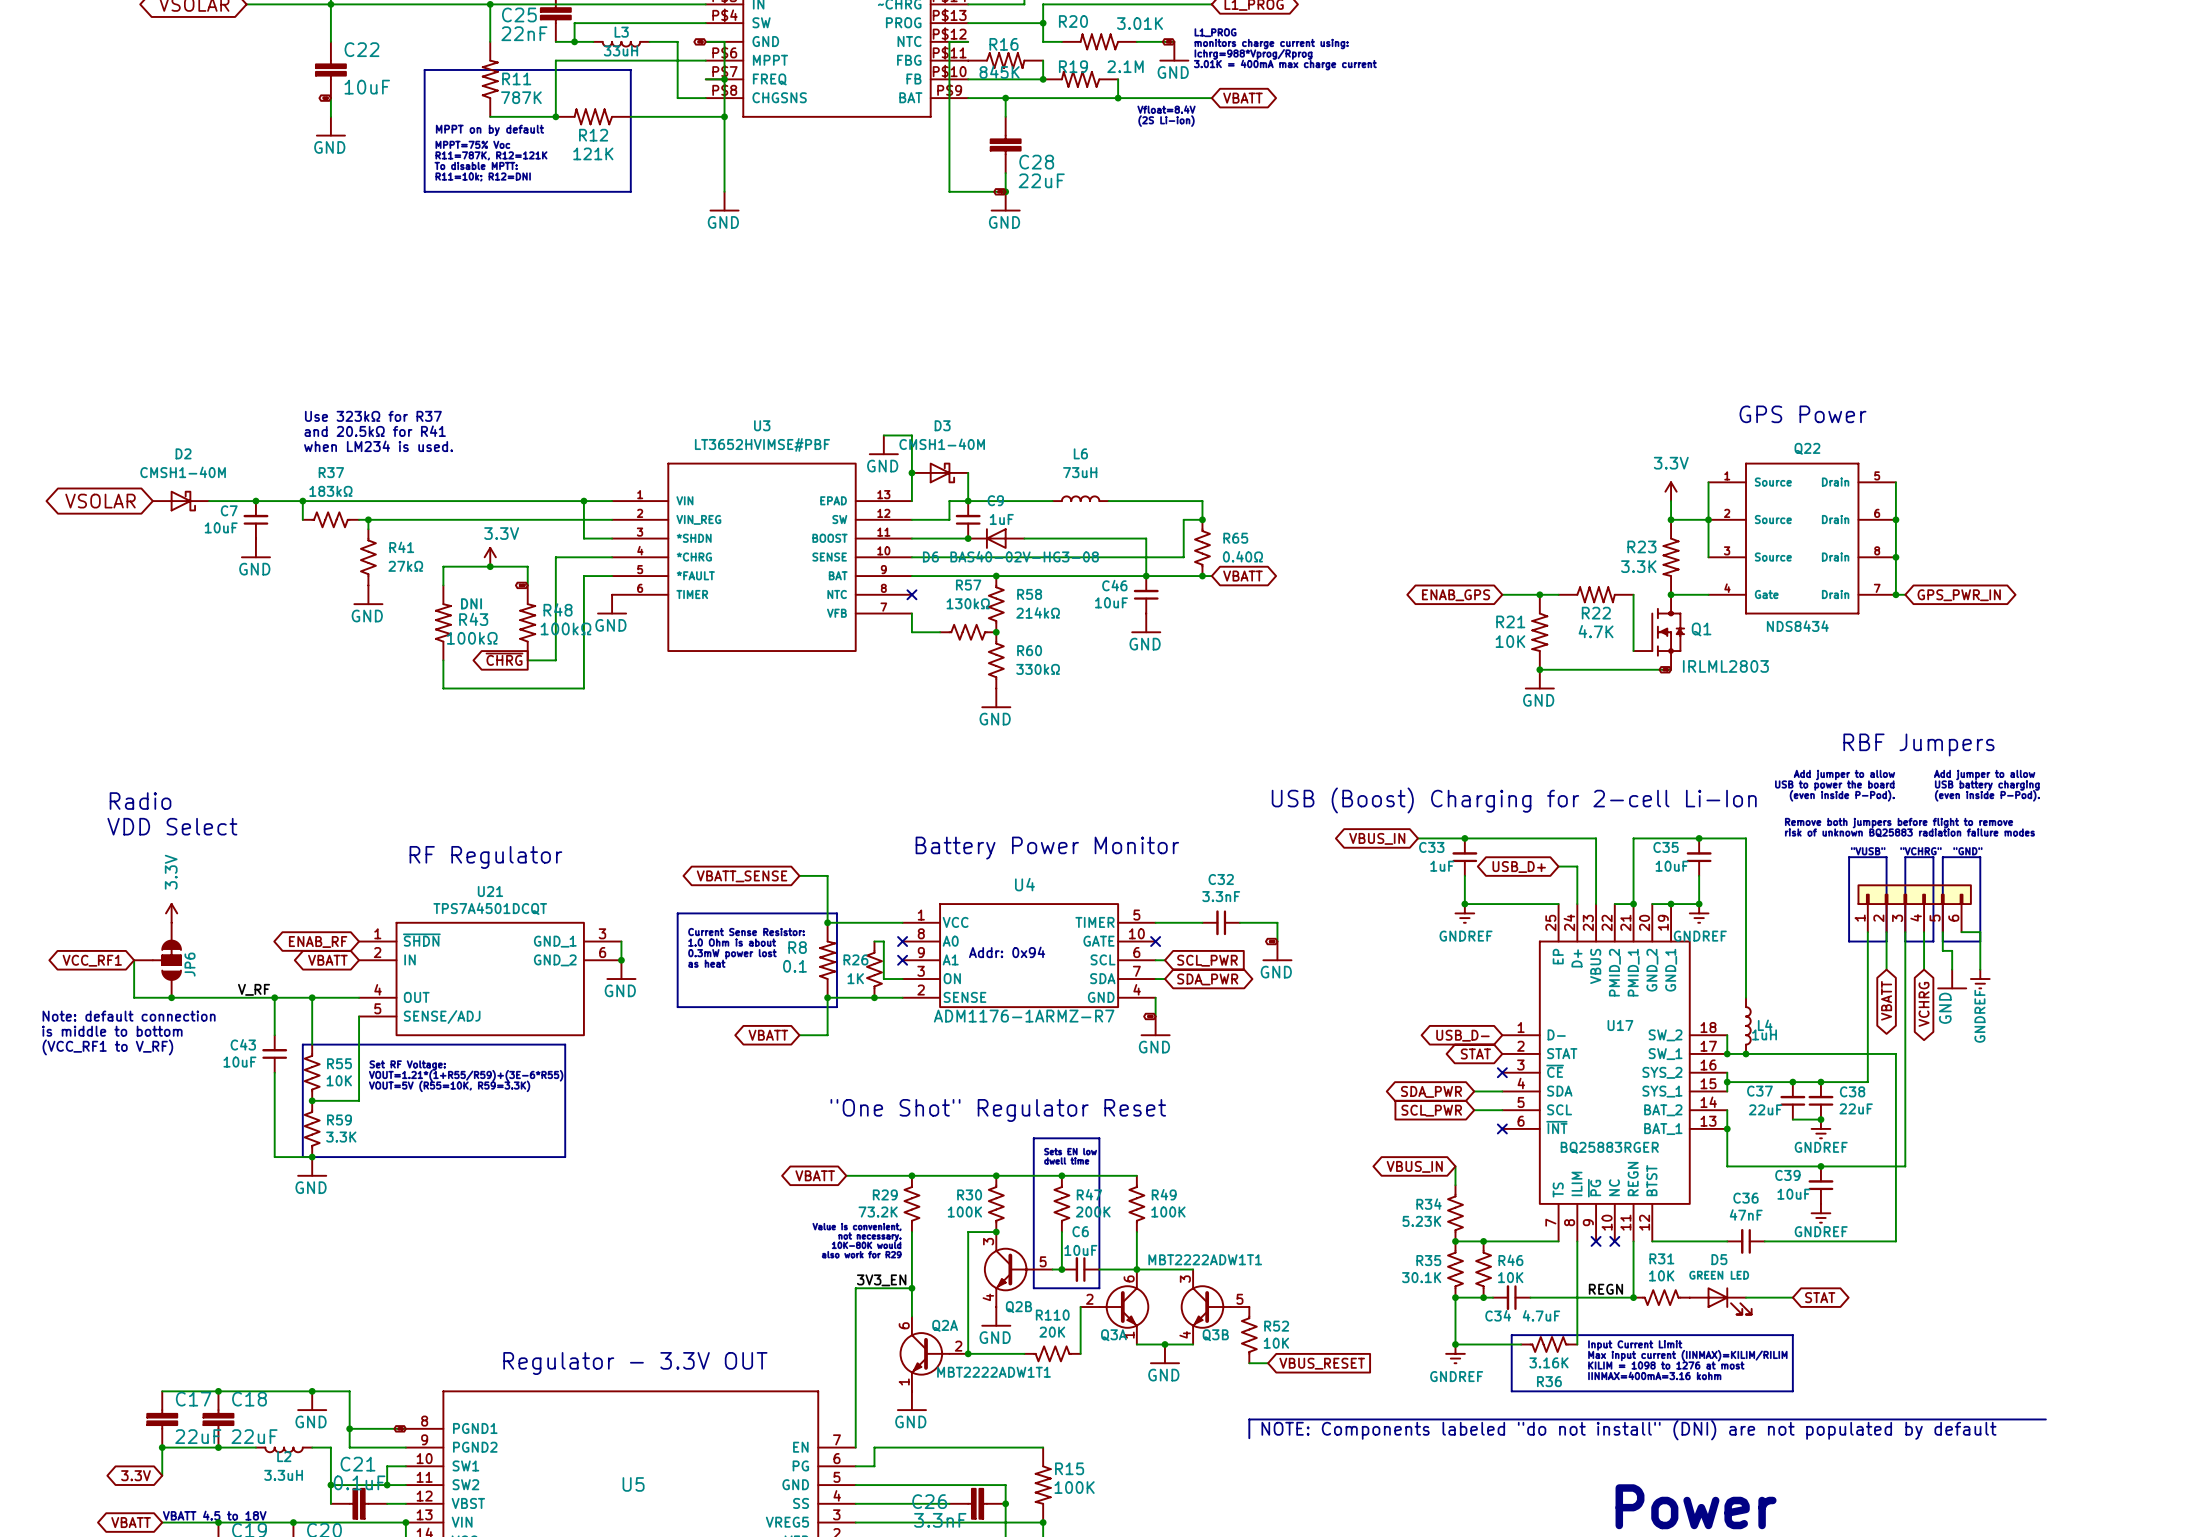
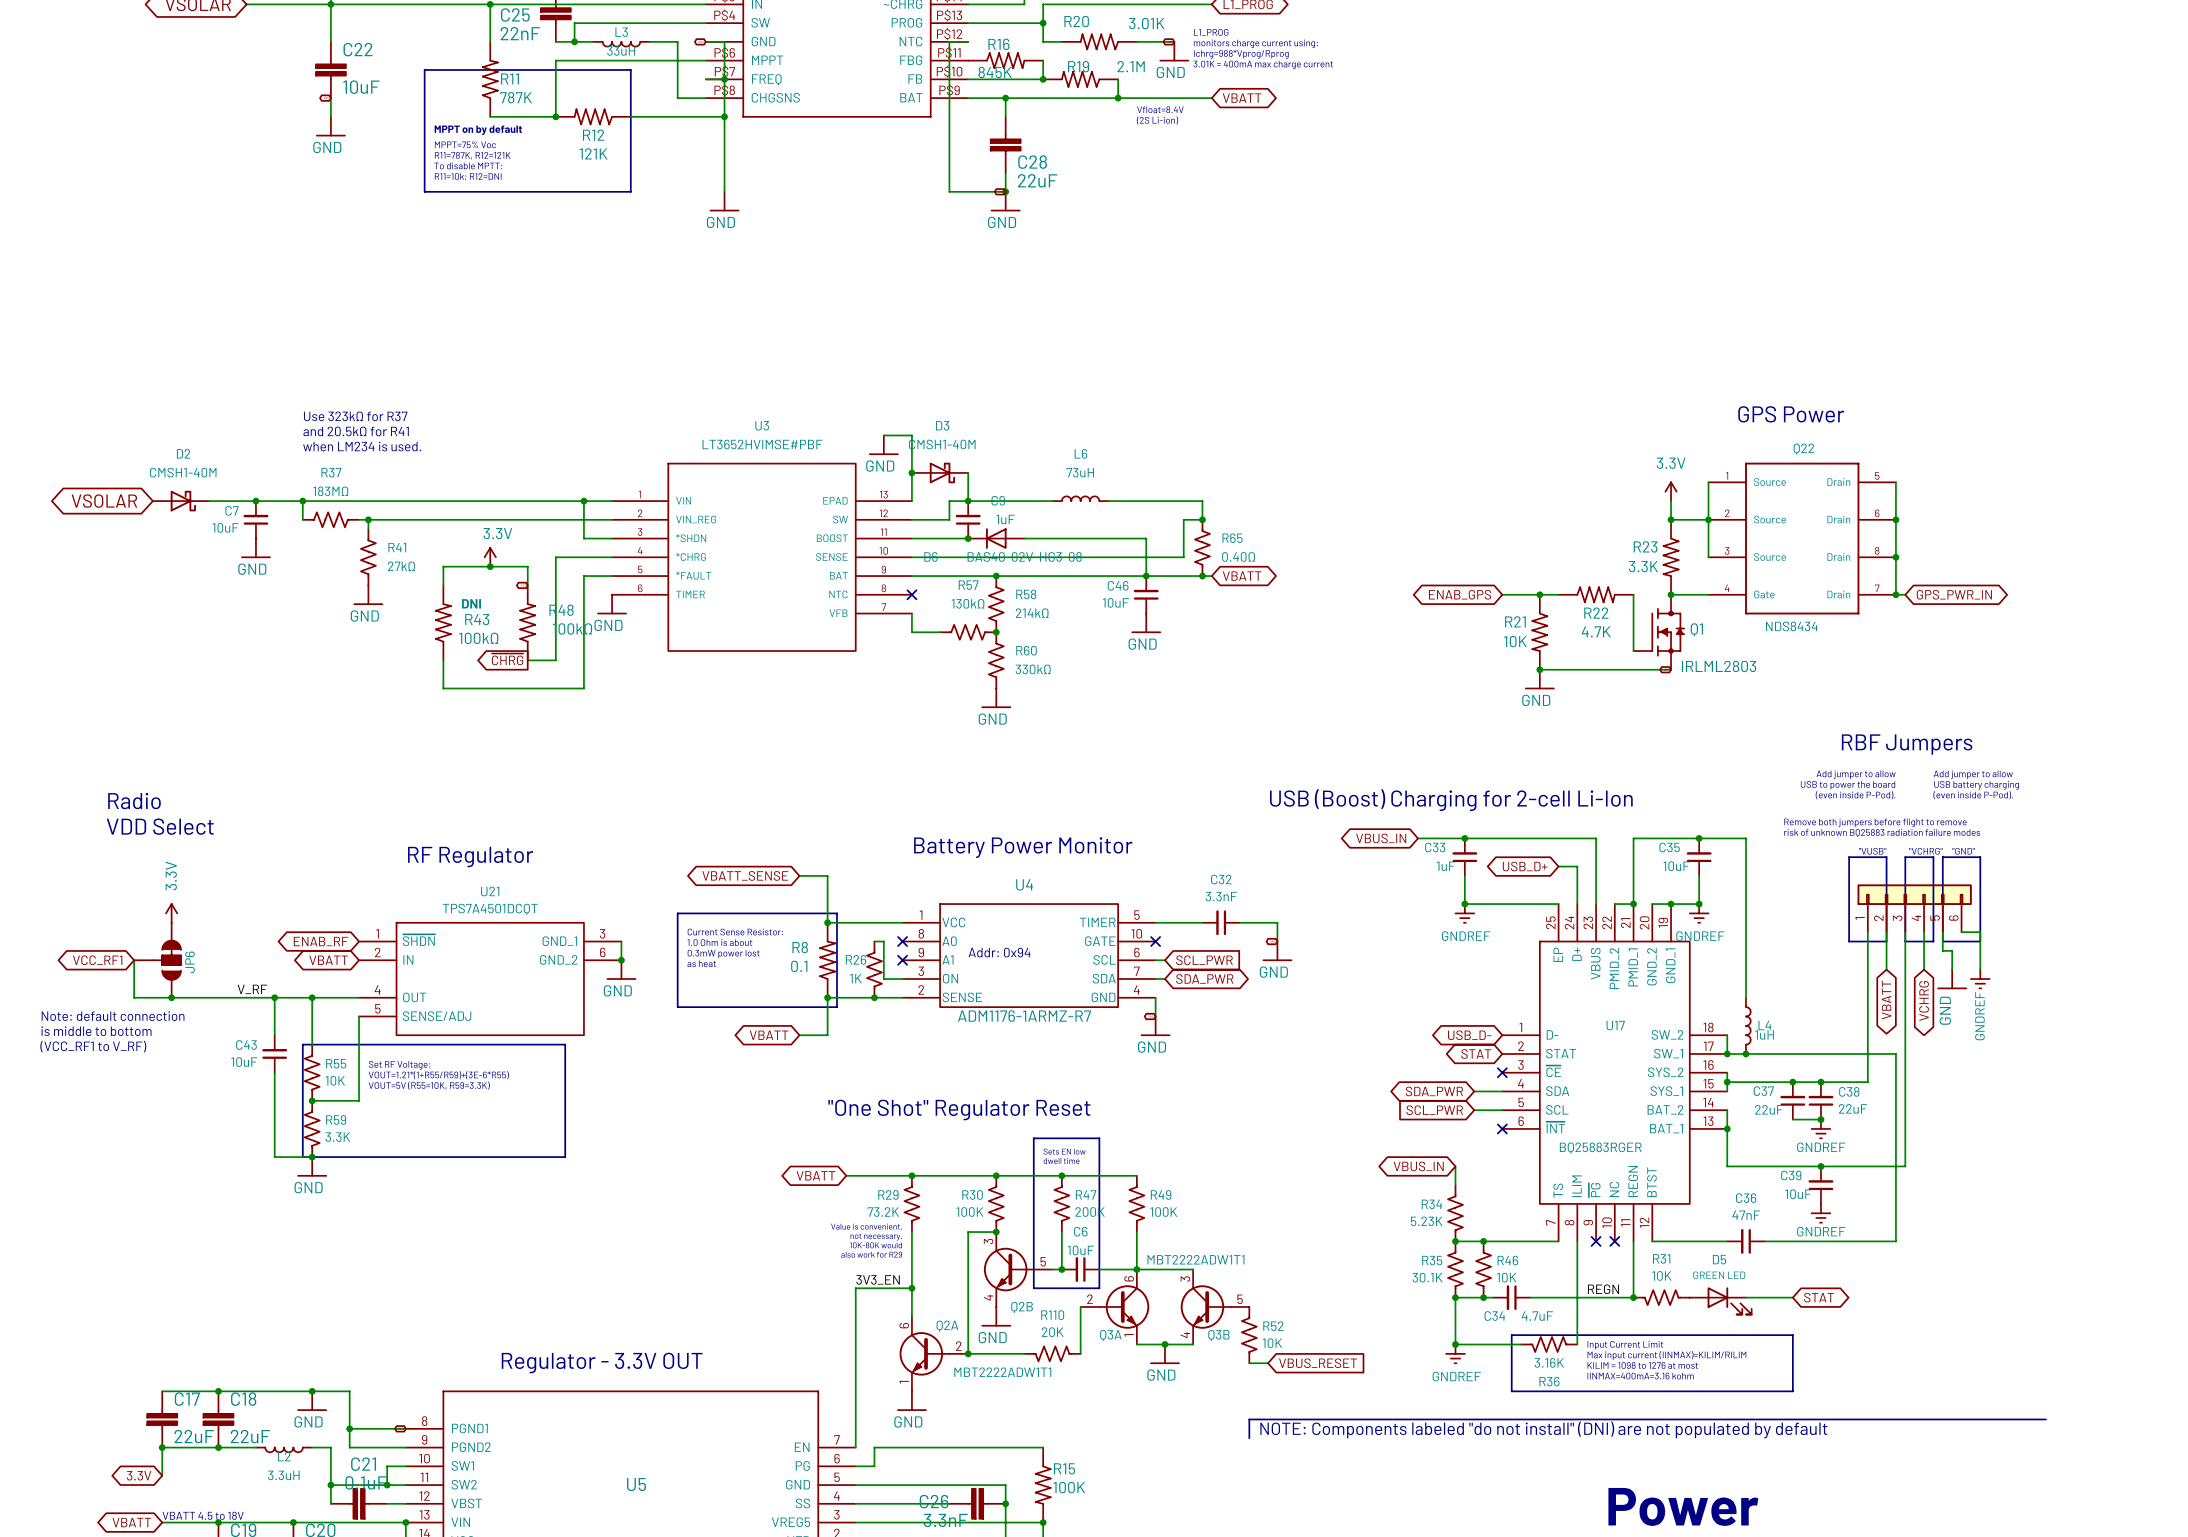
R37 value: 183kΩ (330, 491) -> 183MΩ (330, 491)

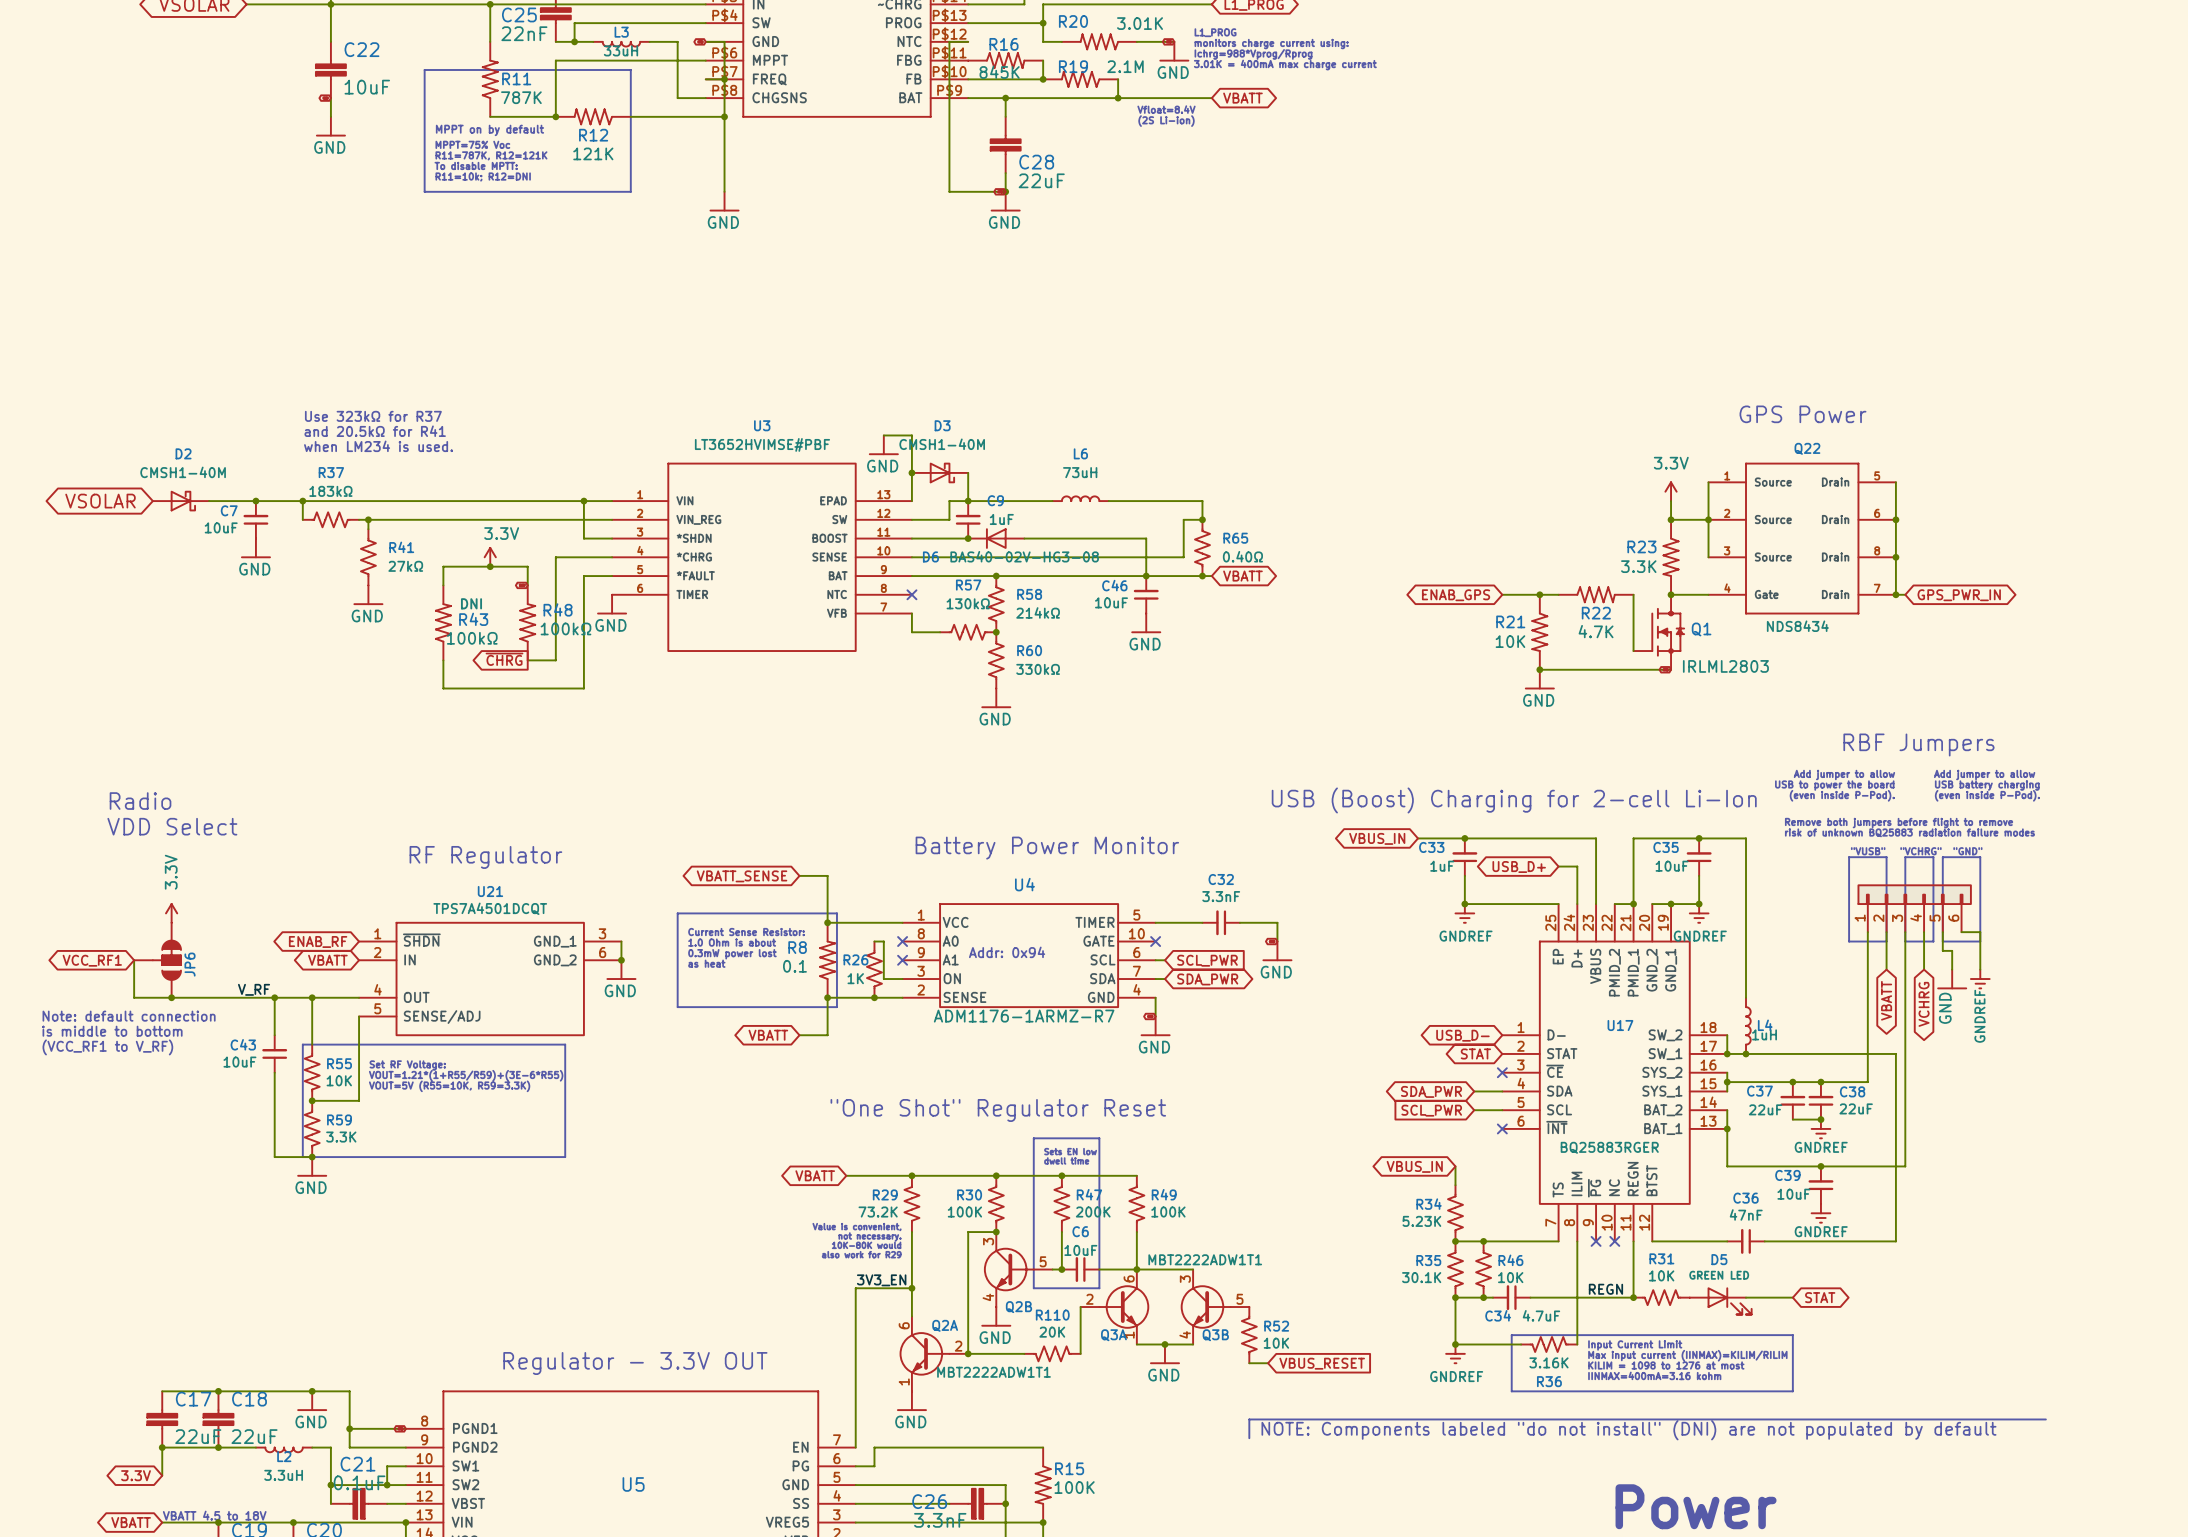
R37 value: 183MΩ (330, 491) -> 183kΩ (330, 491)

